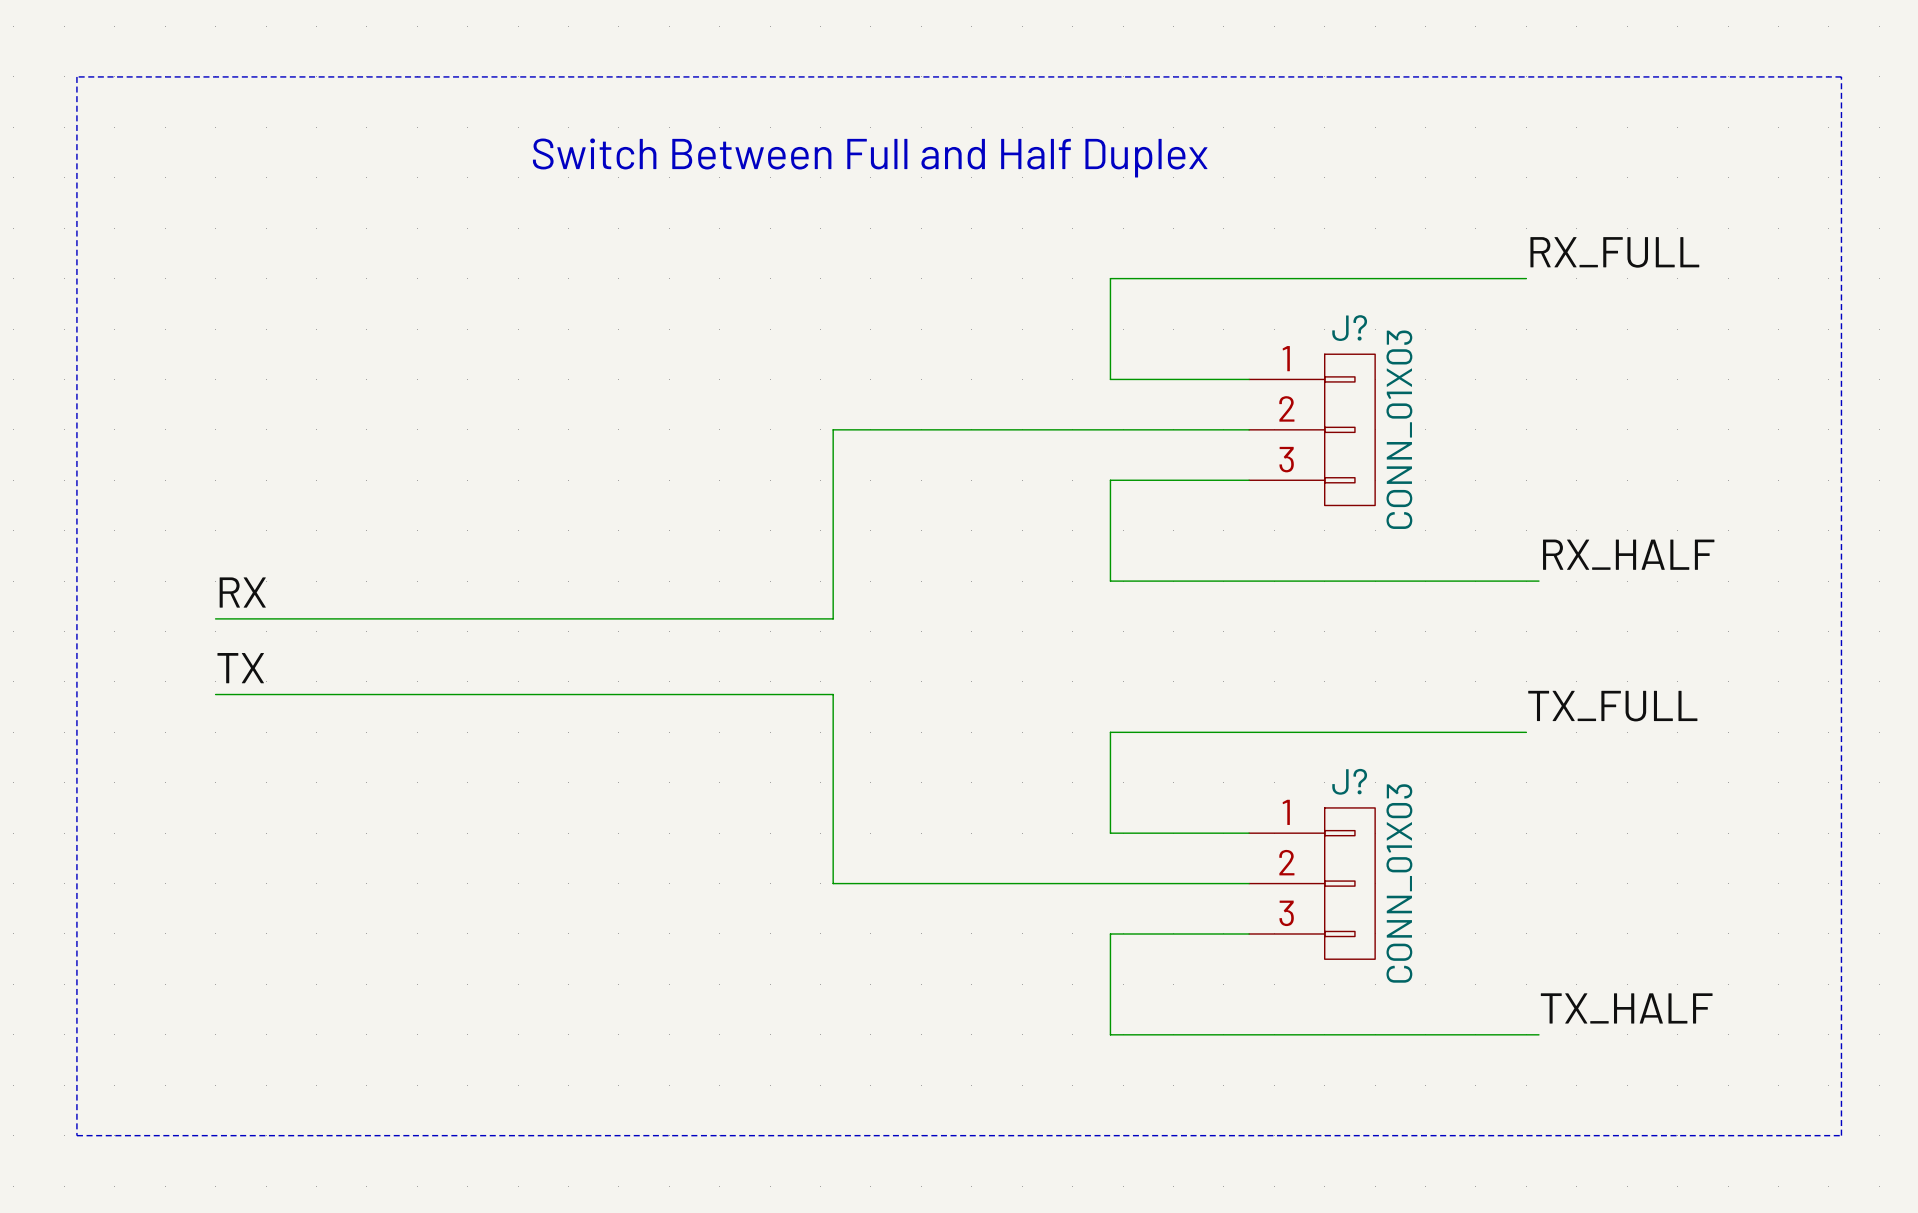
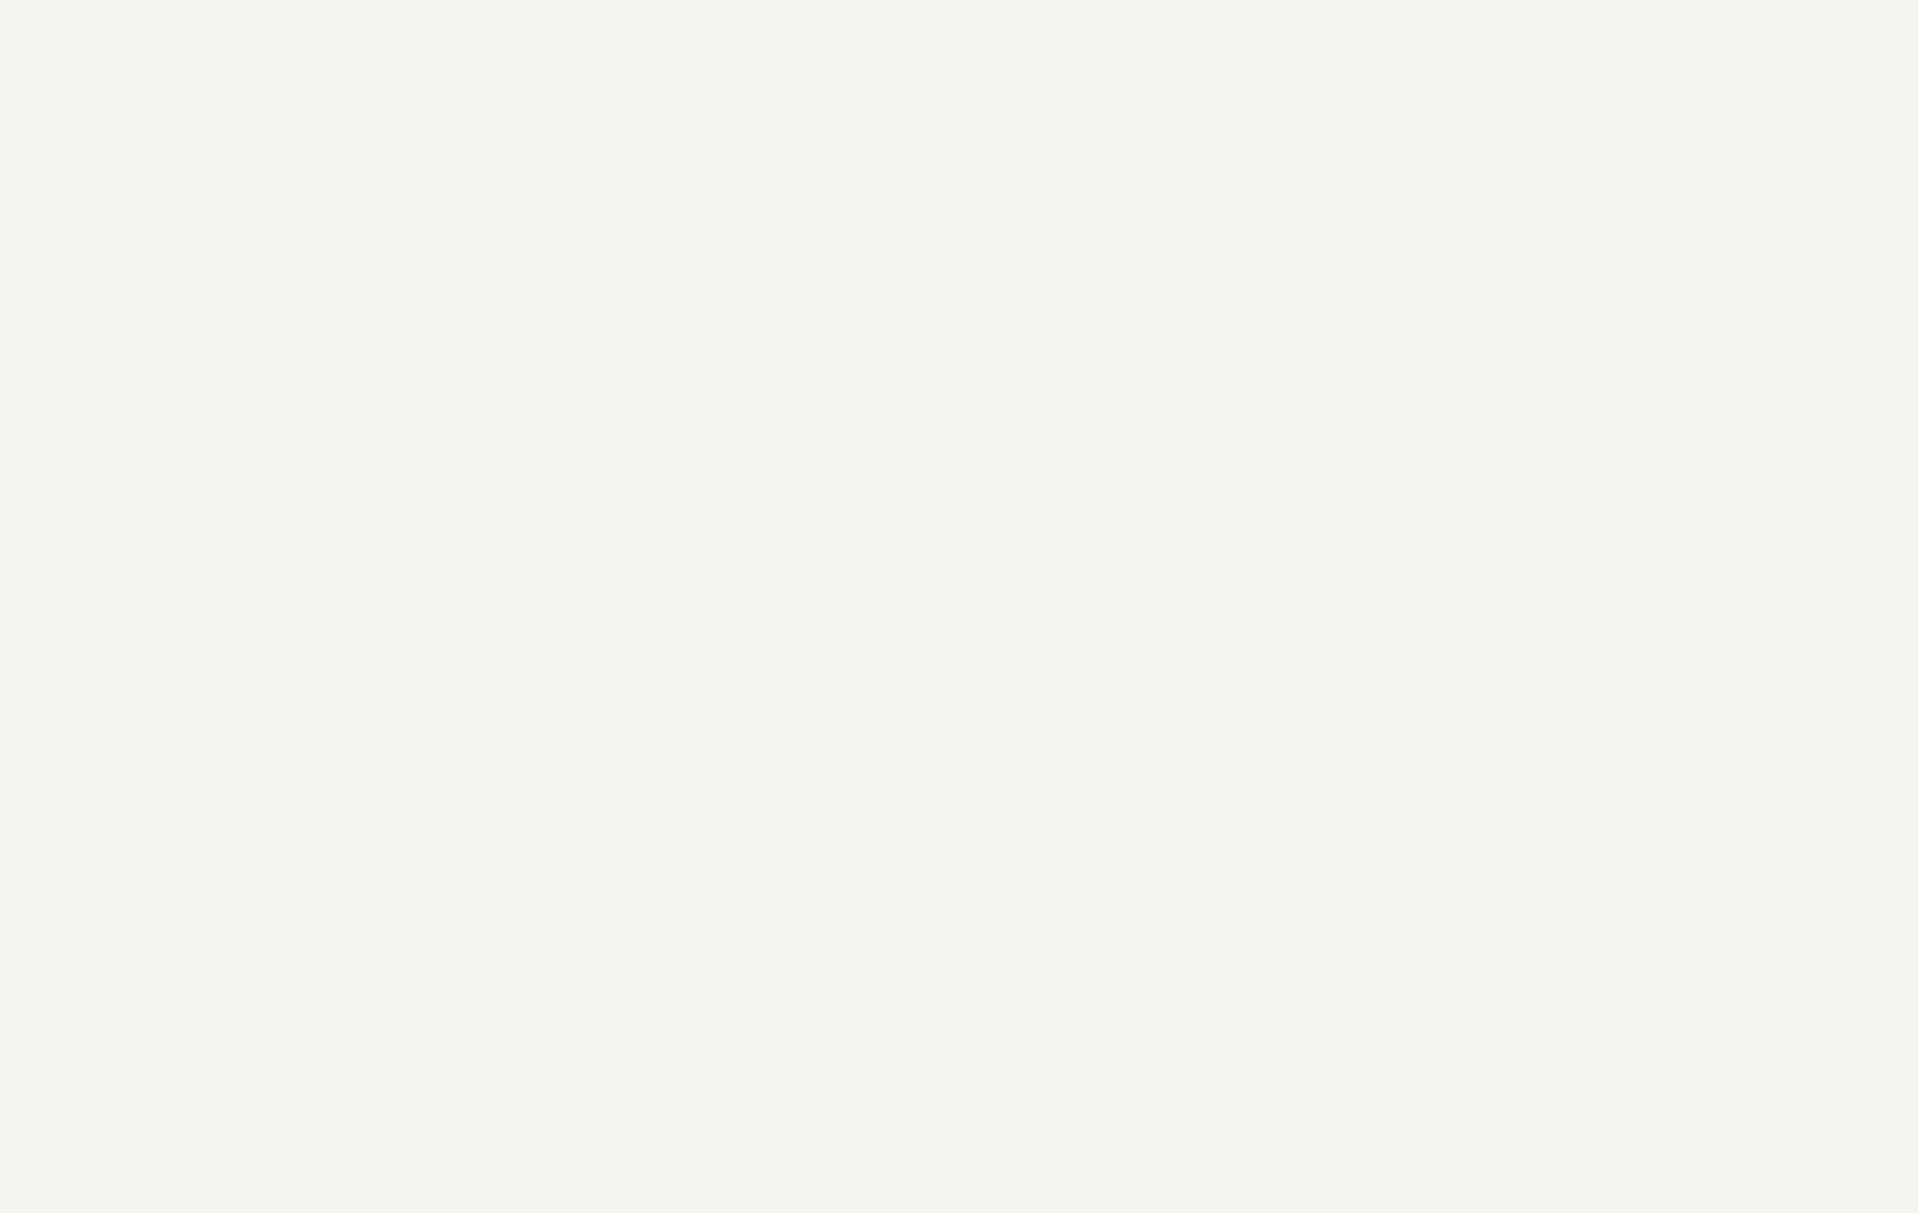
line: (76, 76) (76, 1135) (1841, 1135) (1841, 76) (76, 76) -> none
text: Switch Between Full and Half Duplex (870, 157) -> none
label: RX_FULL (1614, 252) -> none
wire: (1526, 278) (1110, 278) (1110, 379) (1249, 379) -> none
wire: (1249, 429) (833, 429) (833, 618) (215, 618) -> none
J?: CONN_01X03 (1312, 429) -> none
wire: (1249, 480) (1110, 480) (1110, 581) (1538, 581) -> none
label: RX_HALF (1628, 554) -> none
label: RX (242, 592) -> none
label: TX (240, 668) -> none
wire: (215, 694) (833, 694) (833, 883) (1249, 883) -> none
label: TX_FULL (1612, 706) -> none
wire: (1526, 732) (1110, 732) (1110, 833) (1249, 833) -> none
J?: CONN_01X03 (1312, 883) -> none
wire: (1249, 933) (1110, 933) (1110, 1034) (1538, 1034) -> none
label: TX_HALF (1626, 1008) -> none

